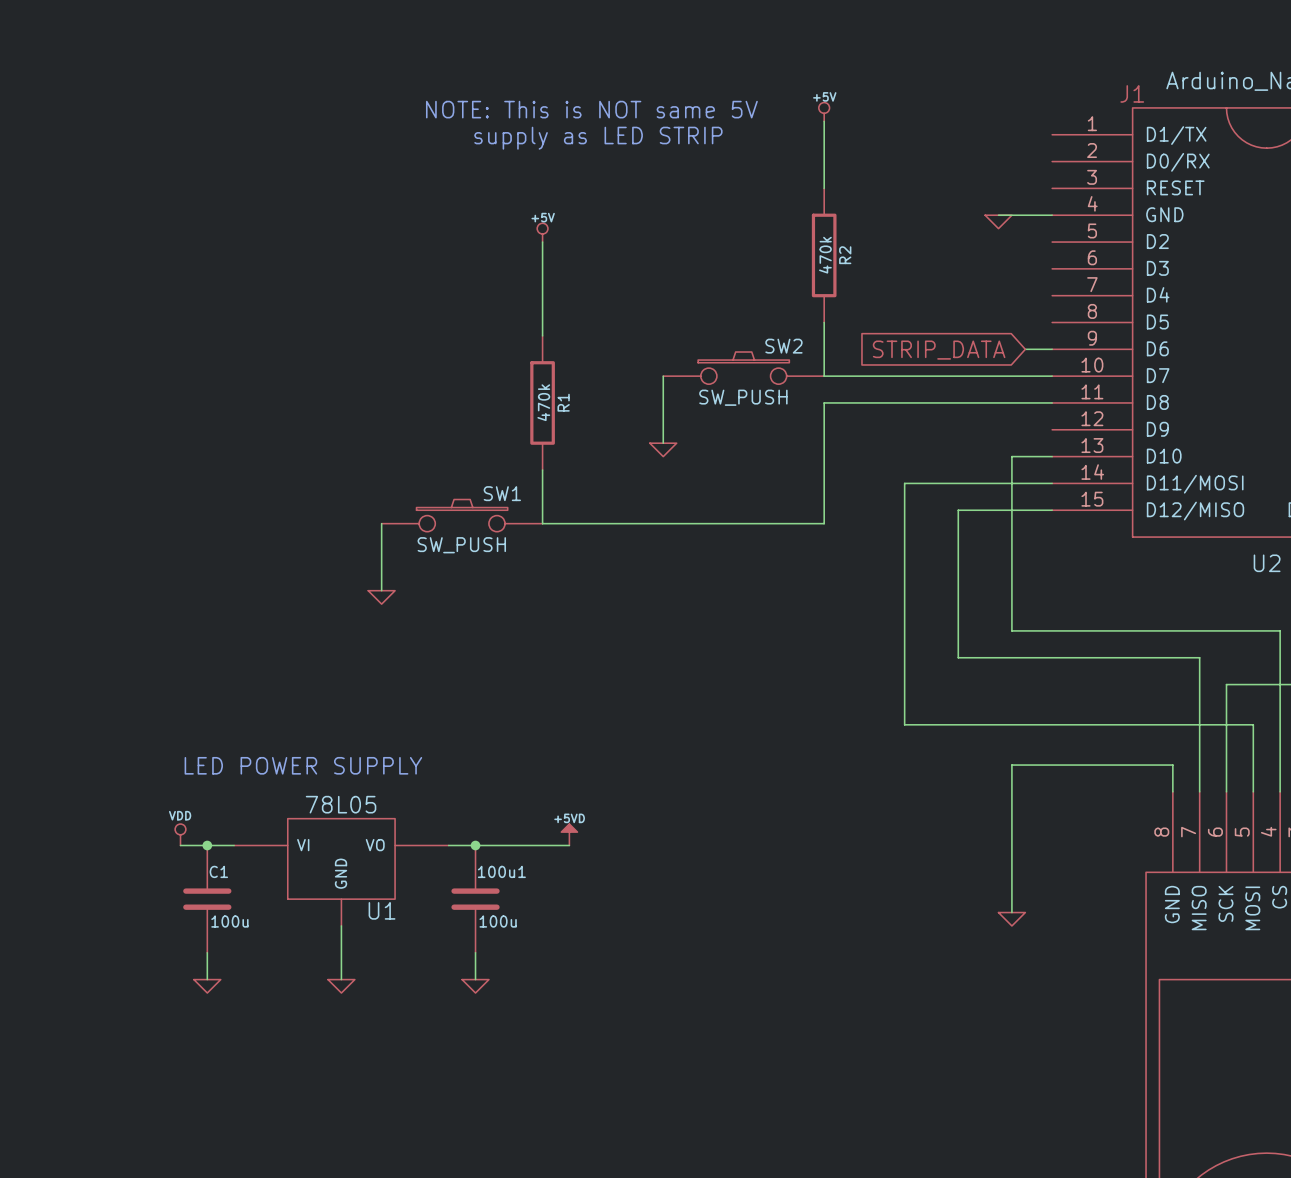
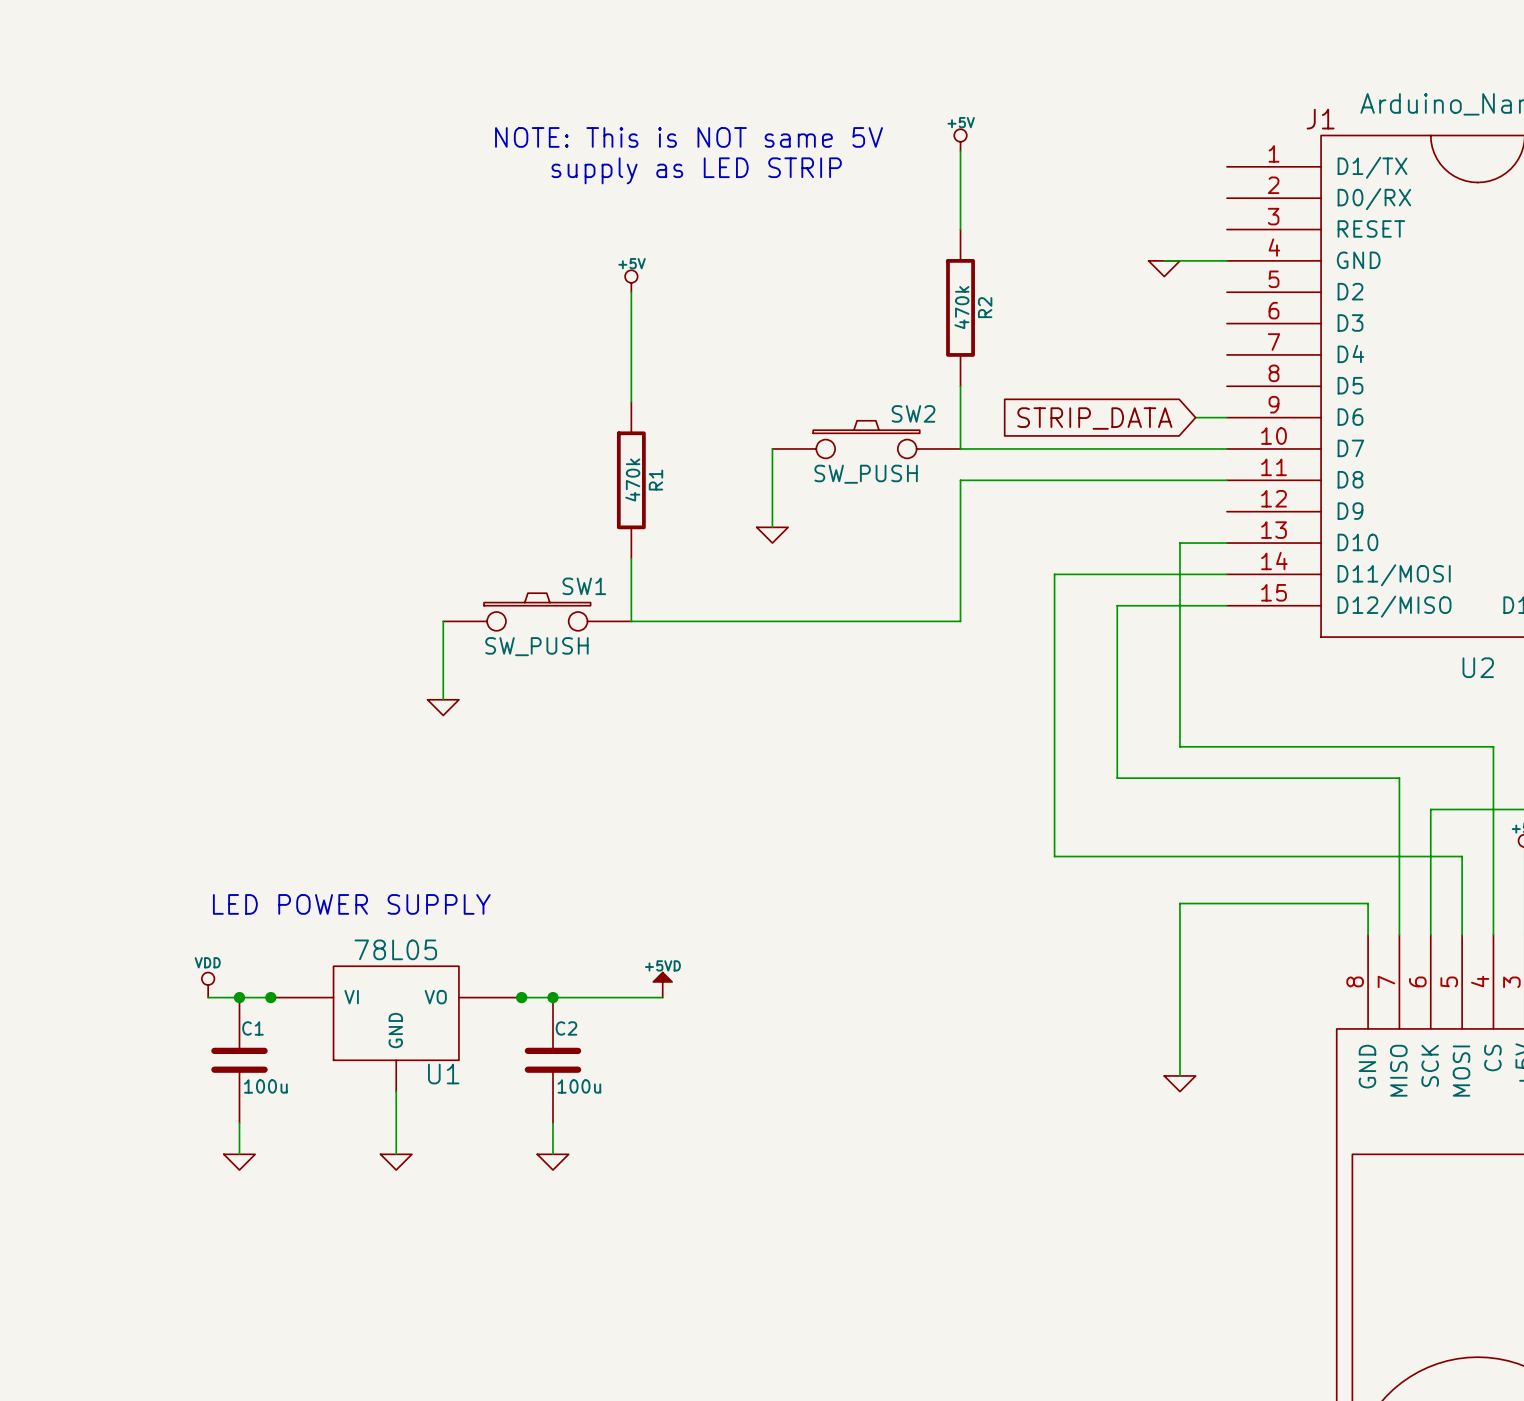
junction: none -> (270, 997)
junction: none -> (521, 997)
100u1 name: 100u1 (501, 871) -> C2 (566, 1028)

